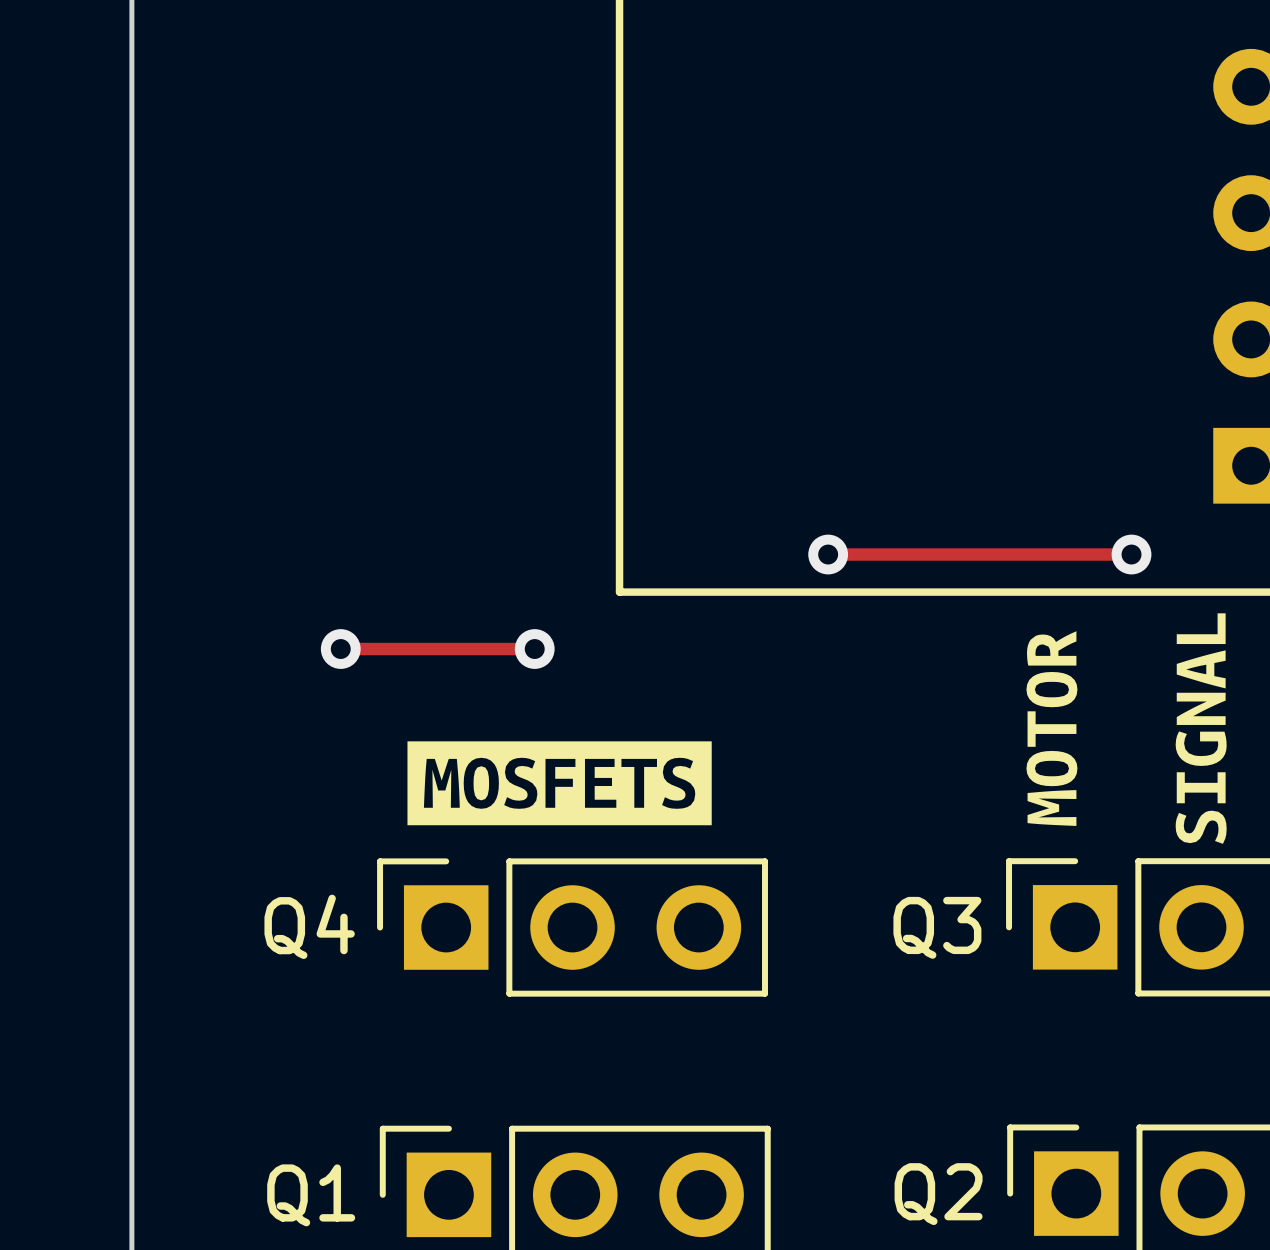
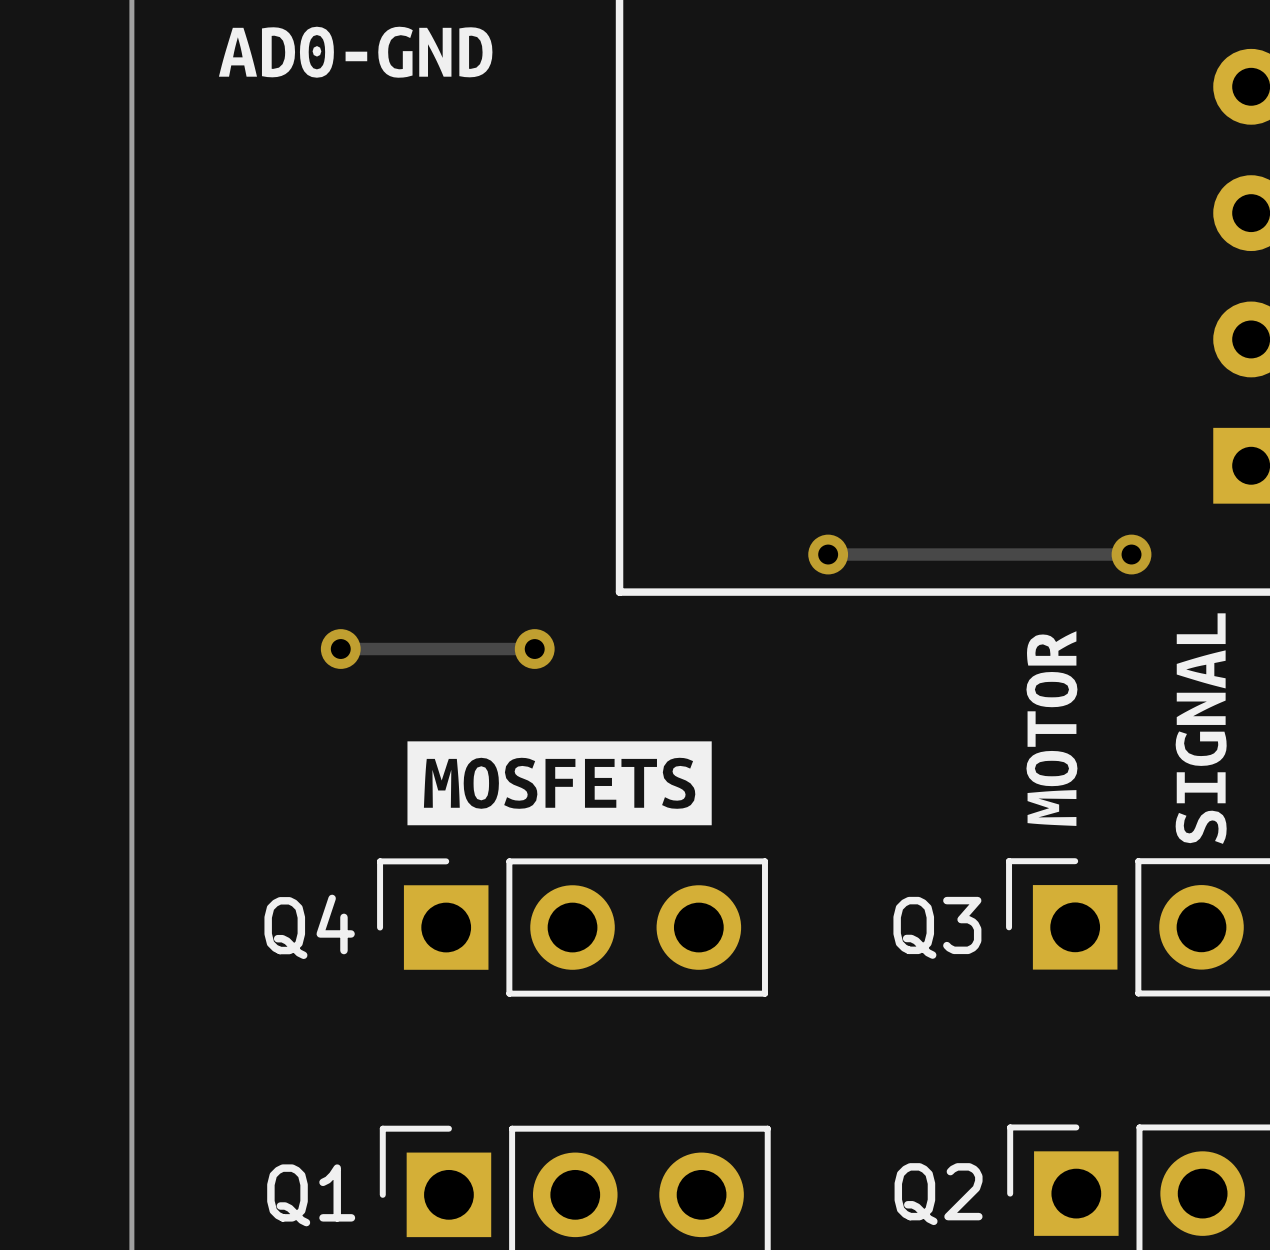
drawing: none -> [218, 26, 493, 78]

